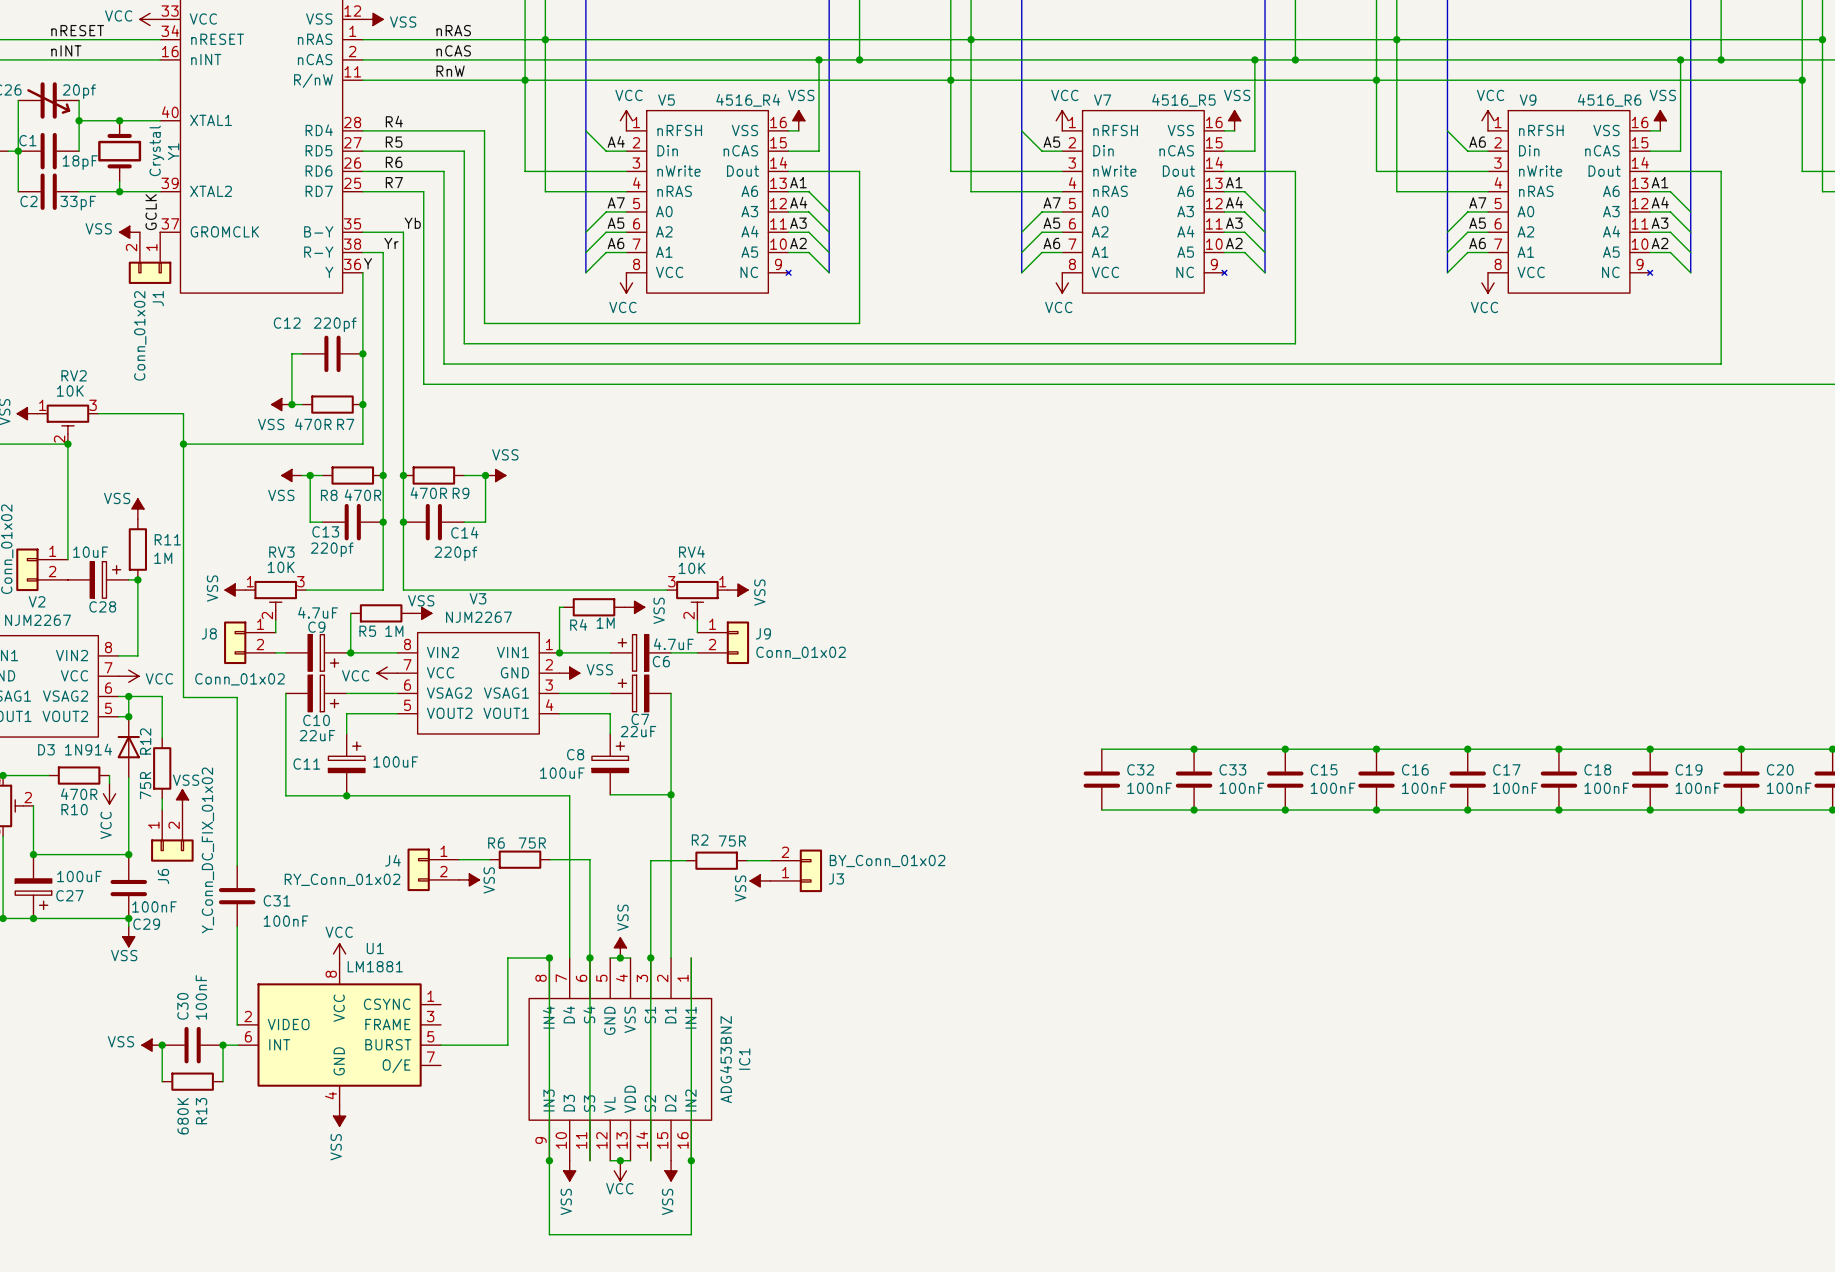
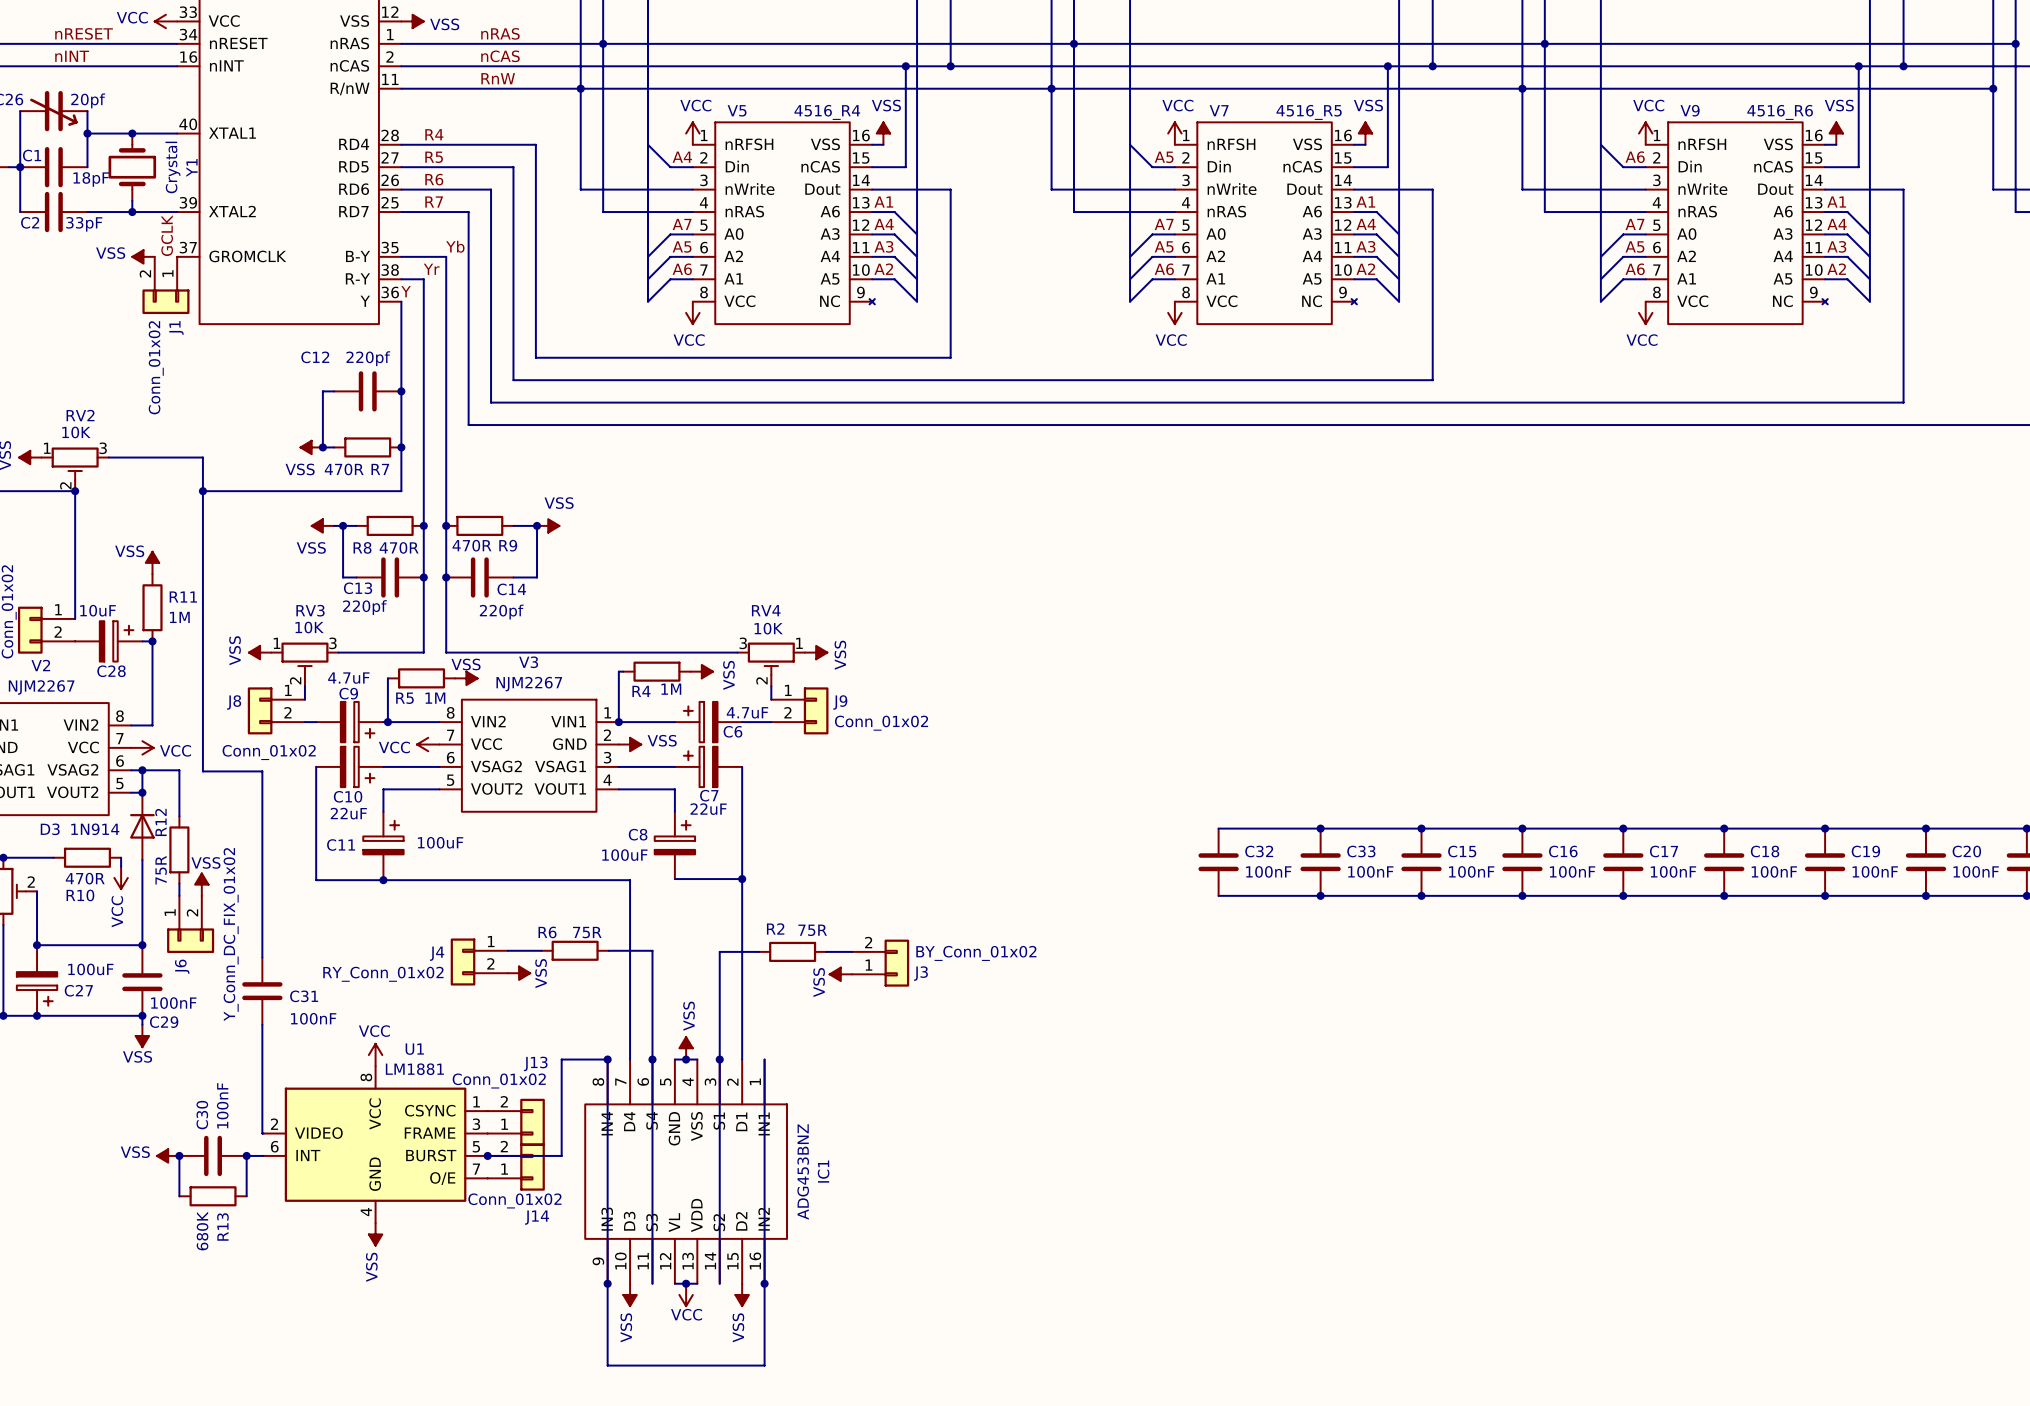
J13: none -> Conn_01x02 (516, 1122)
junction: none -> (487, 1155)
J14: none -> Conn_01x02 (516, 1167)

